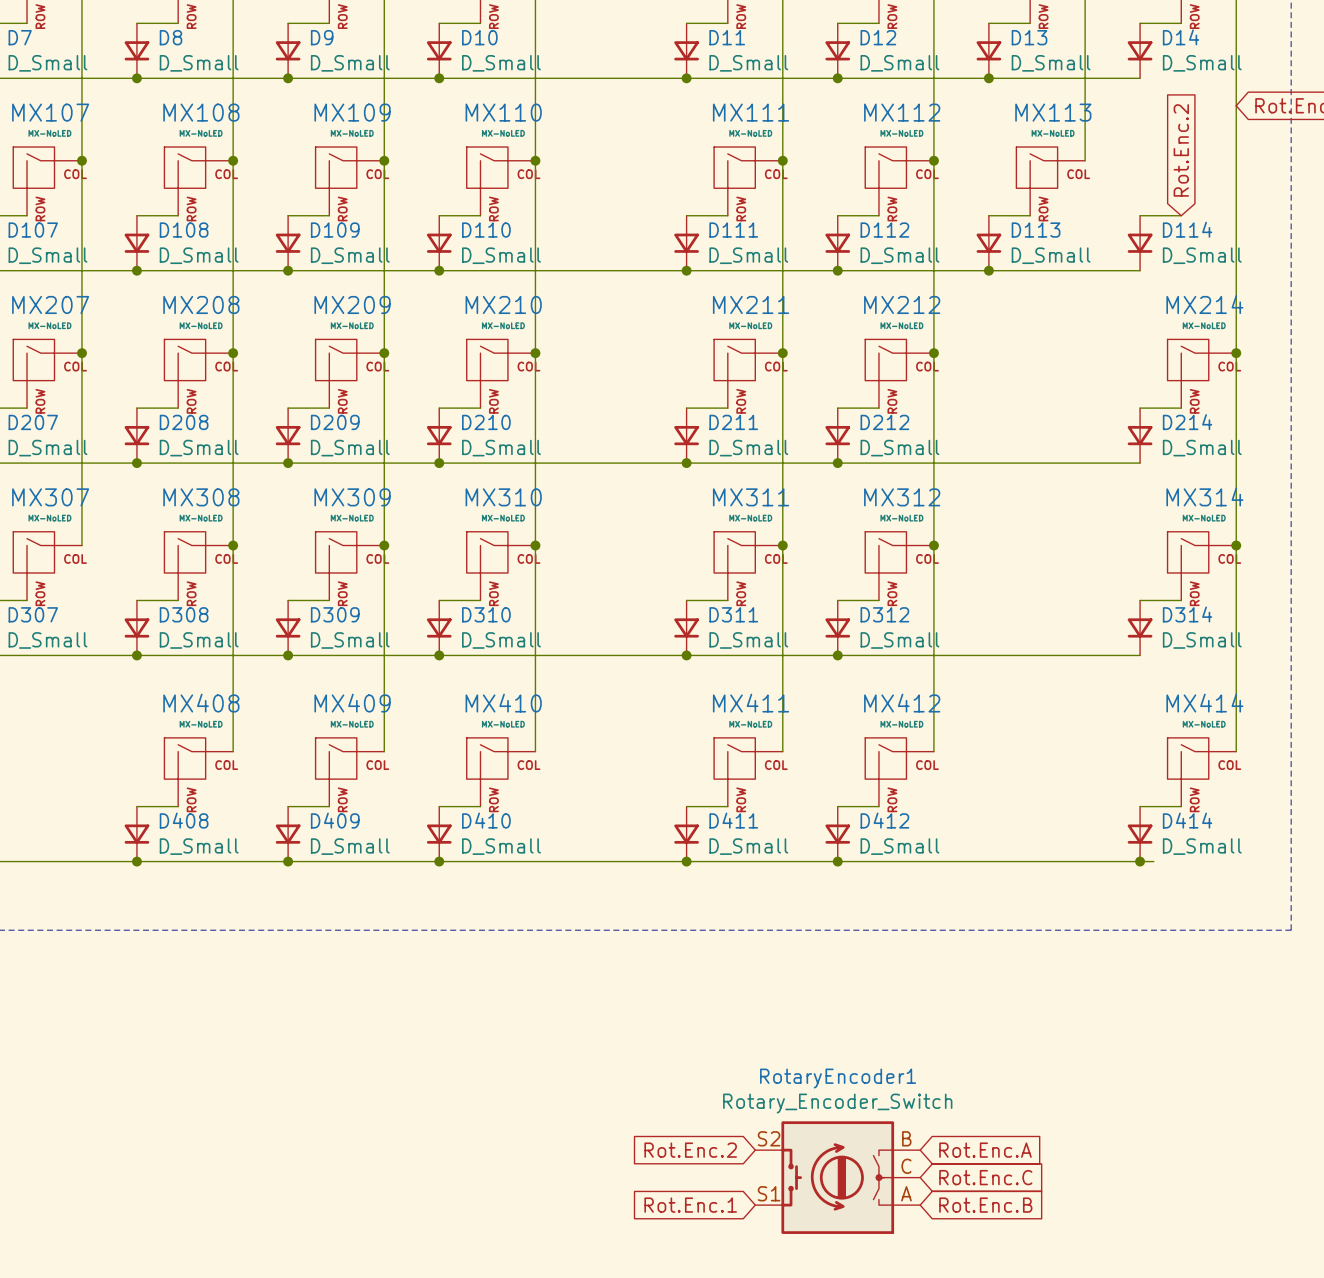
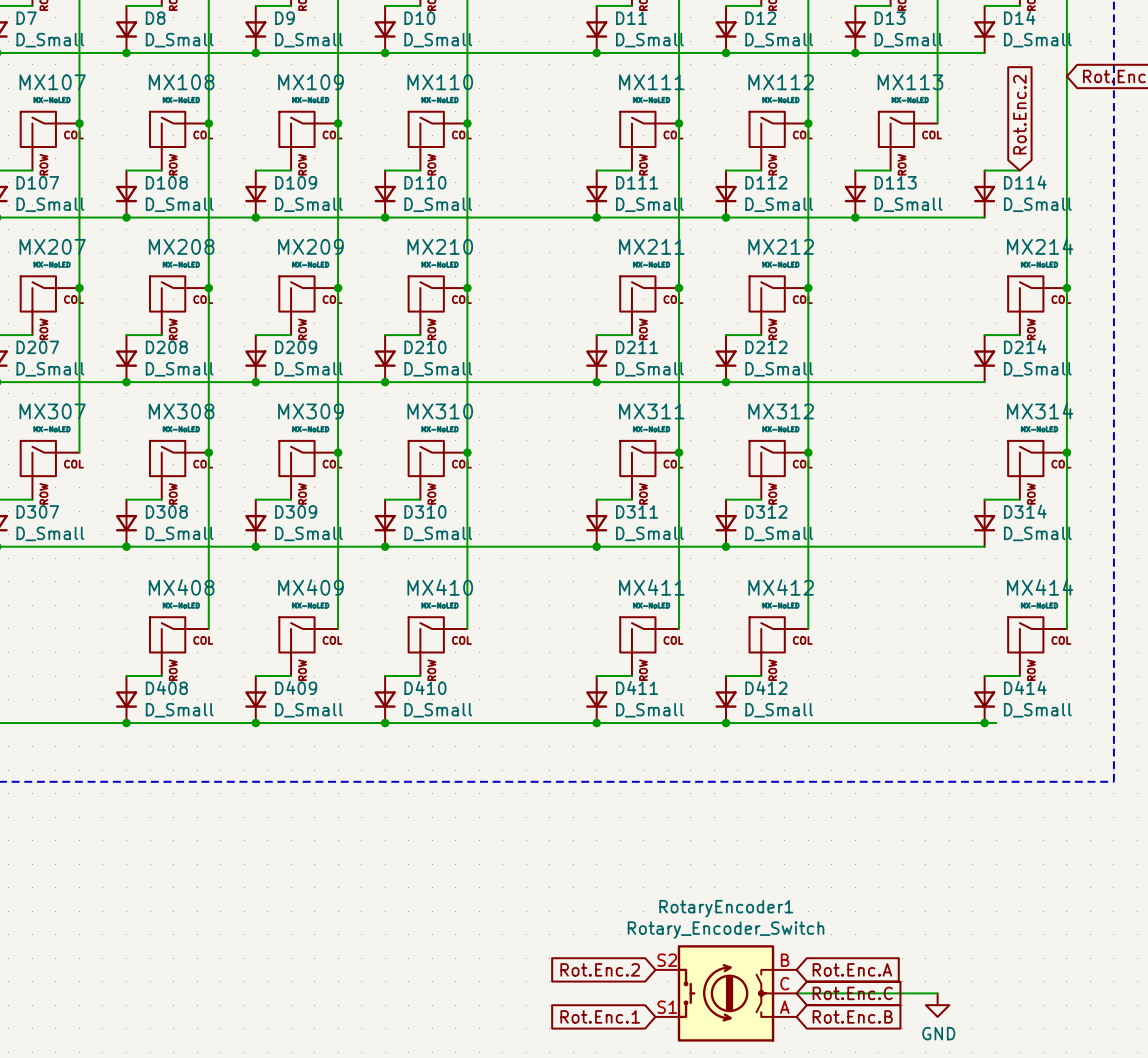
wire: none -> (796, 993) (937, 993)
power symbol: none -> GND (937, 1005)

